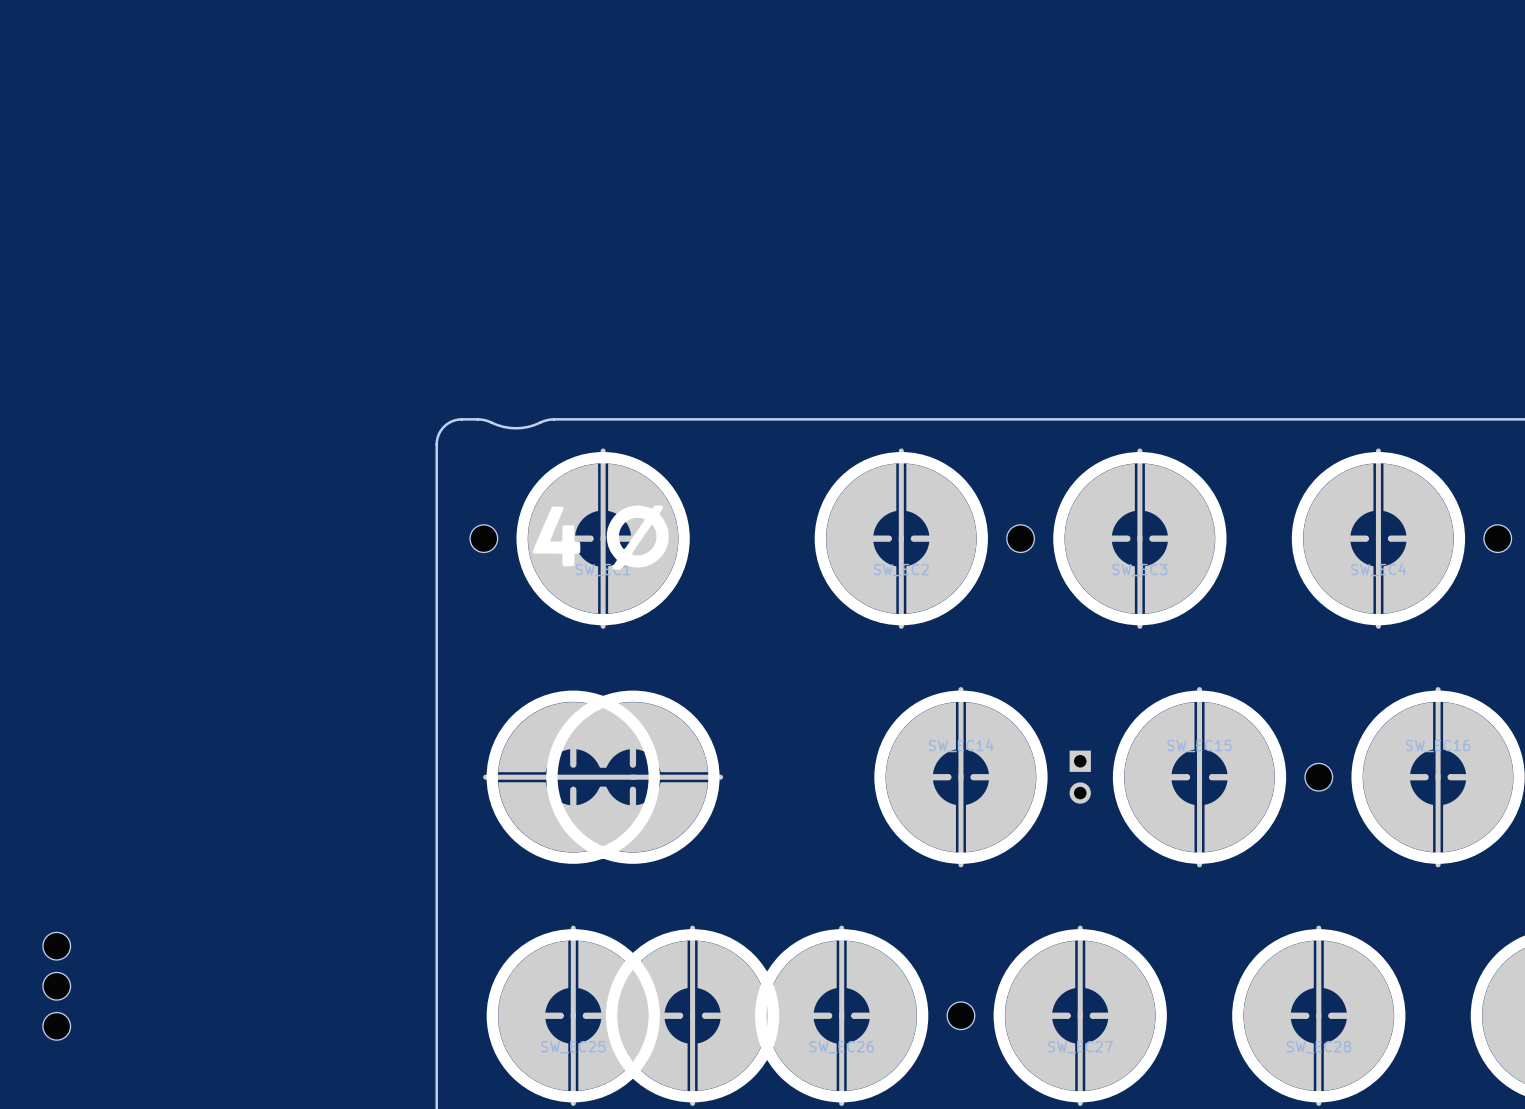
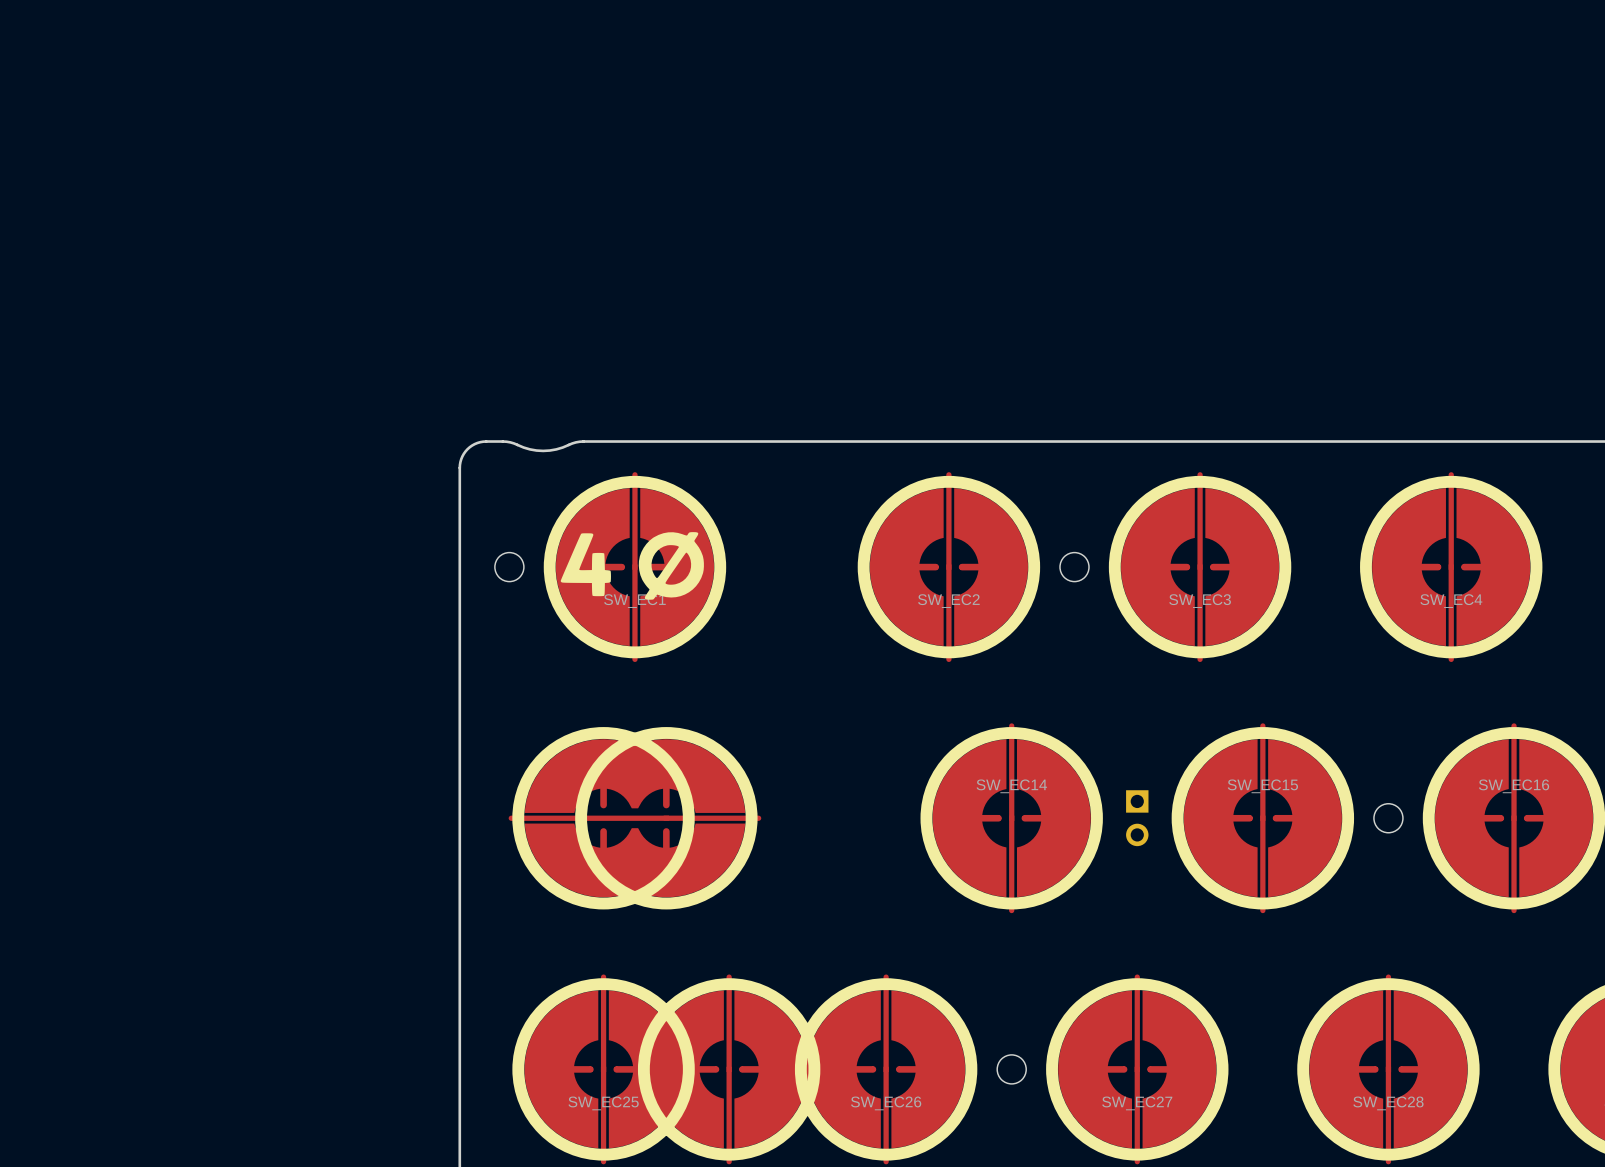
part: (1497, 538) -> none
part: (56, 946) -> none
part: (56, 986) -> none
part: (56, 1026) -> none

